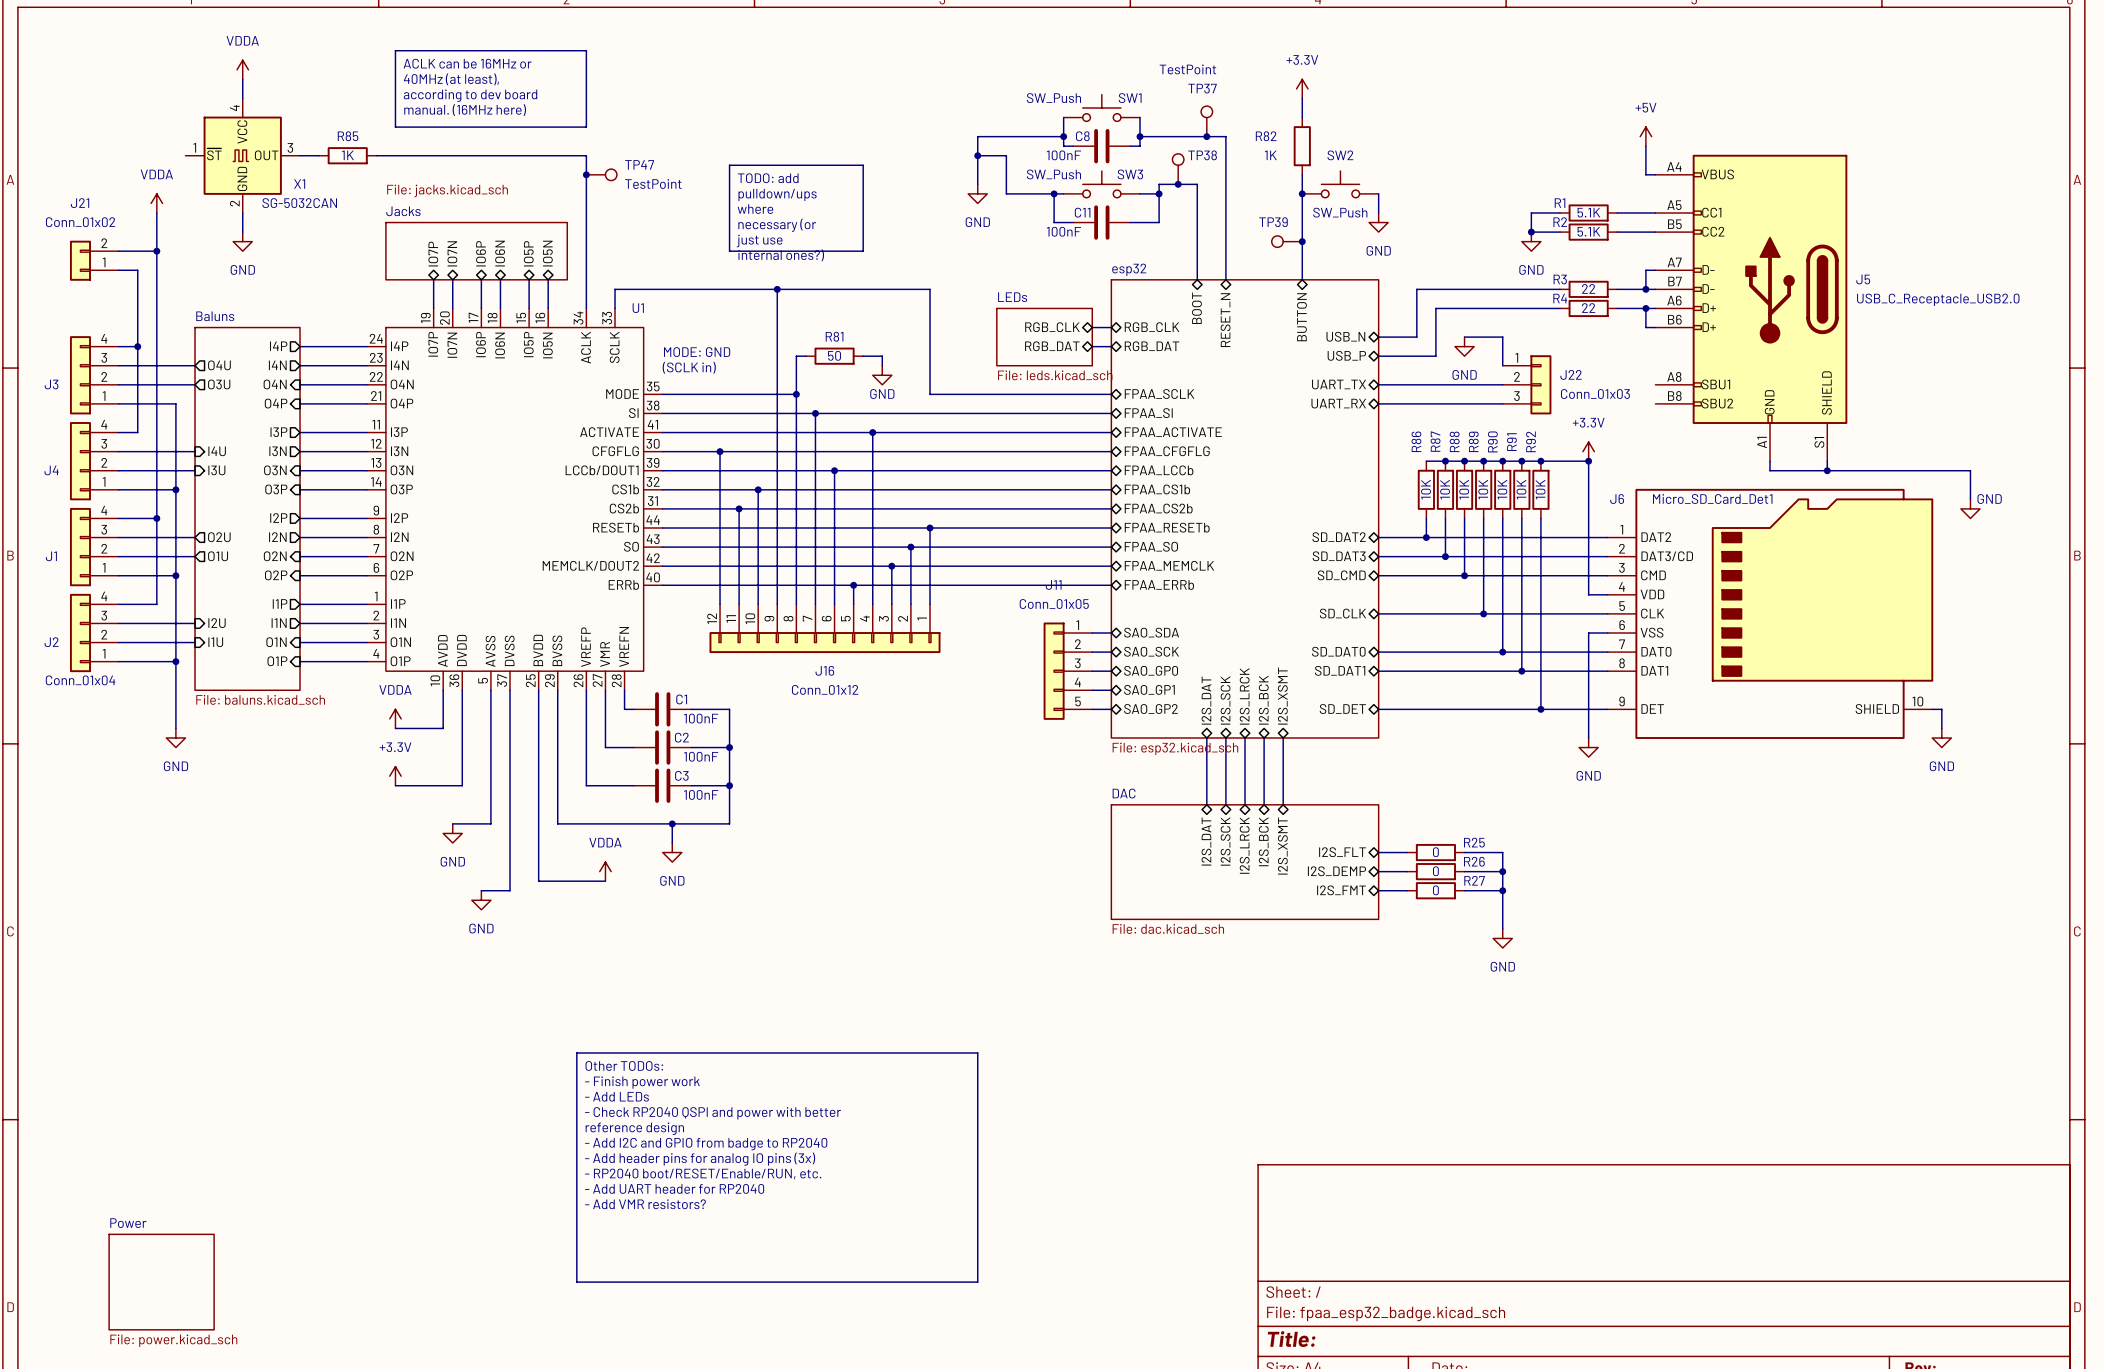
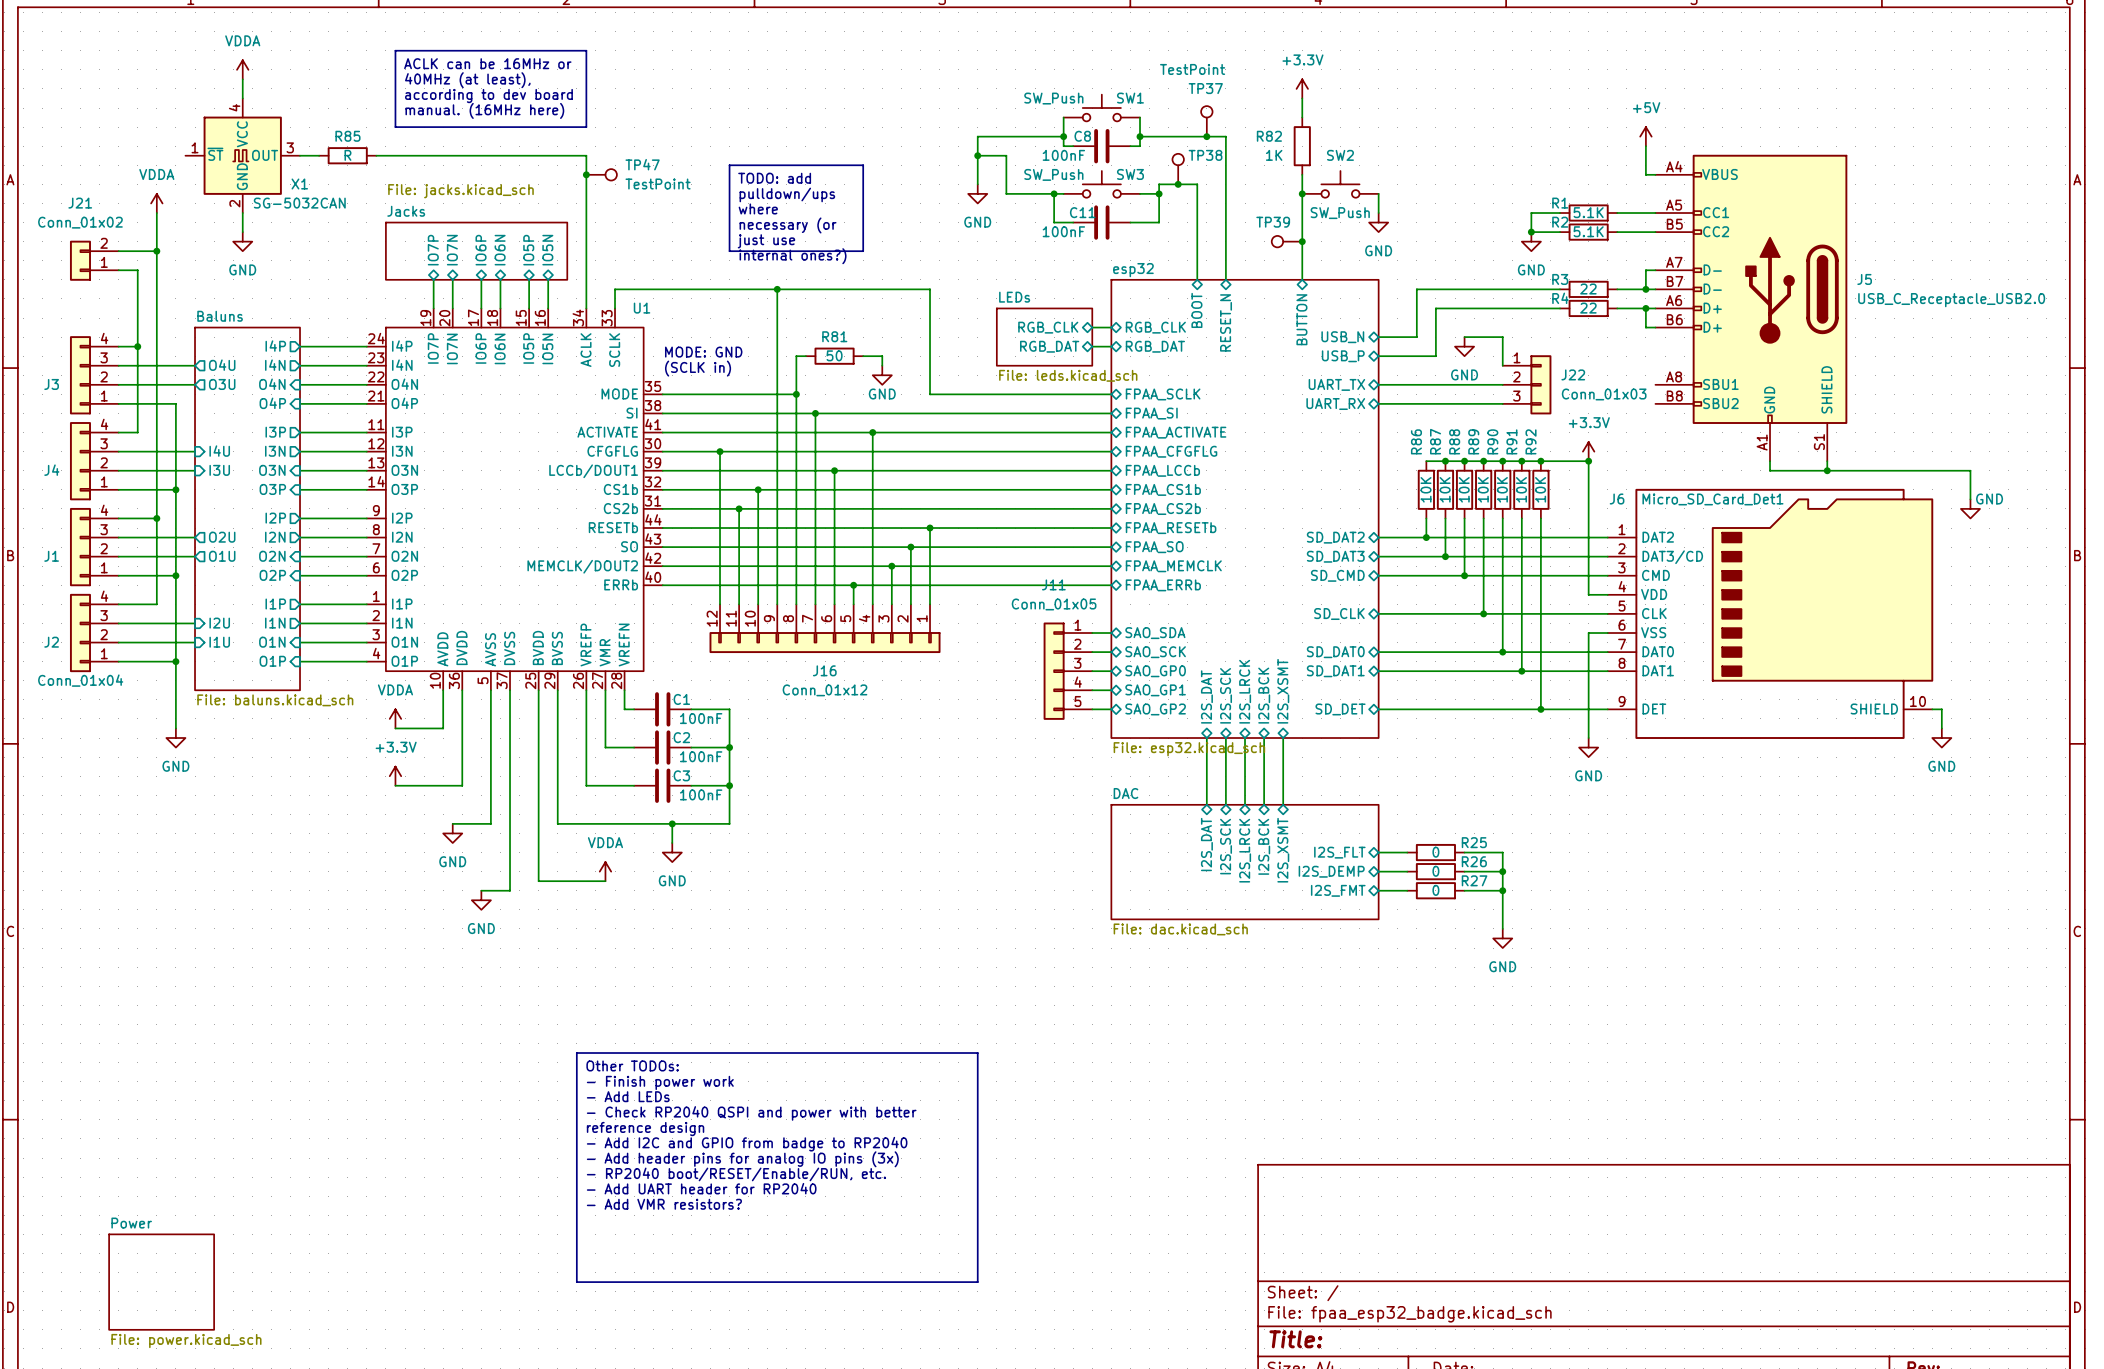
R85 value: 1K (347, 155) -> R (347, 155)

